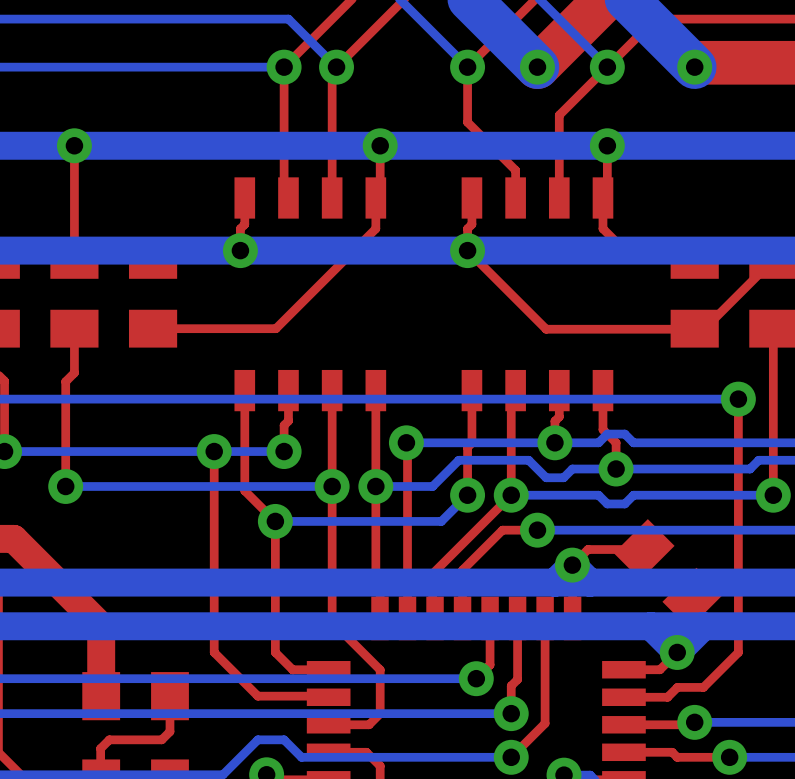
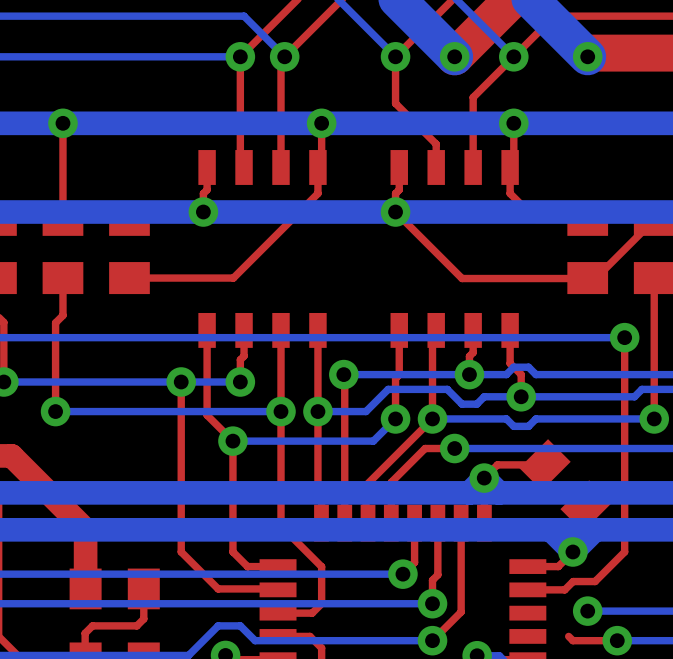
top track: (692, 724) (623, 724) -> none
top track: (672, 752) (623, 752) -> none

